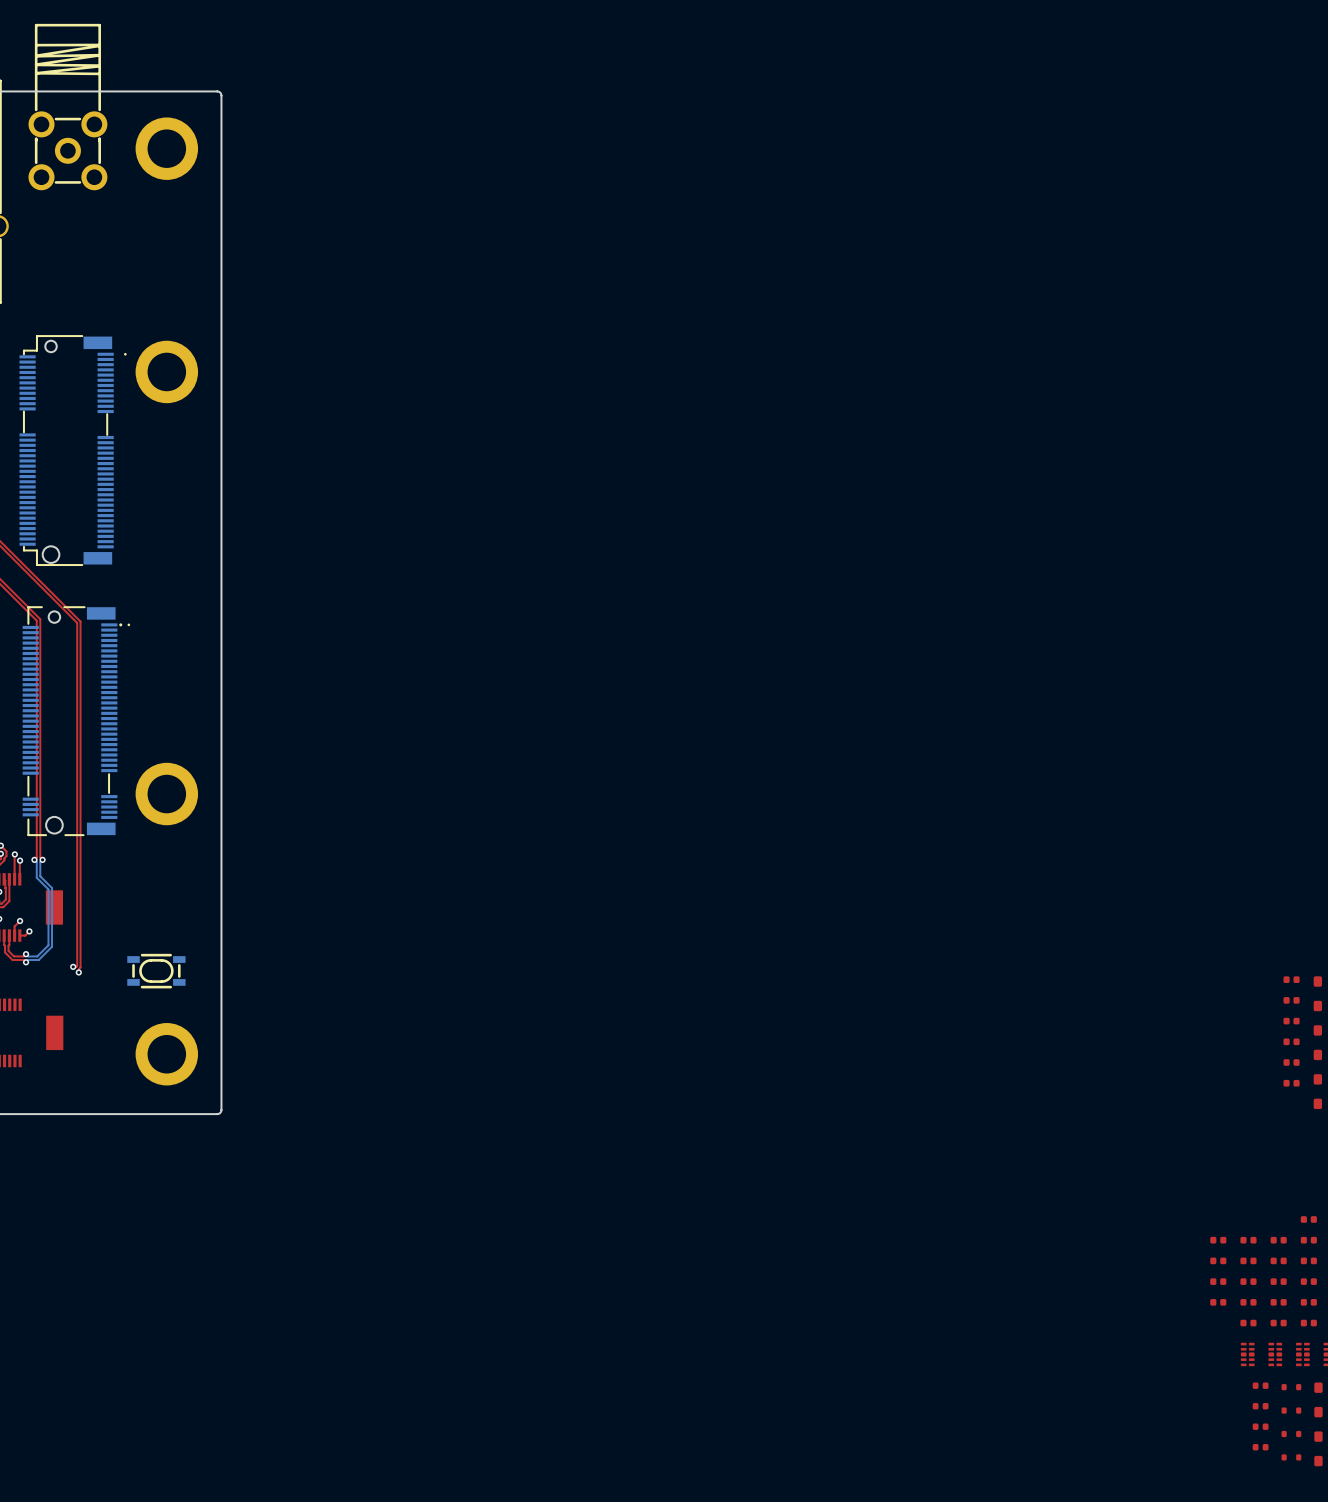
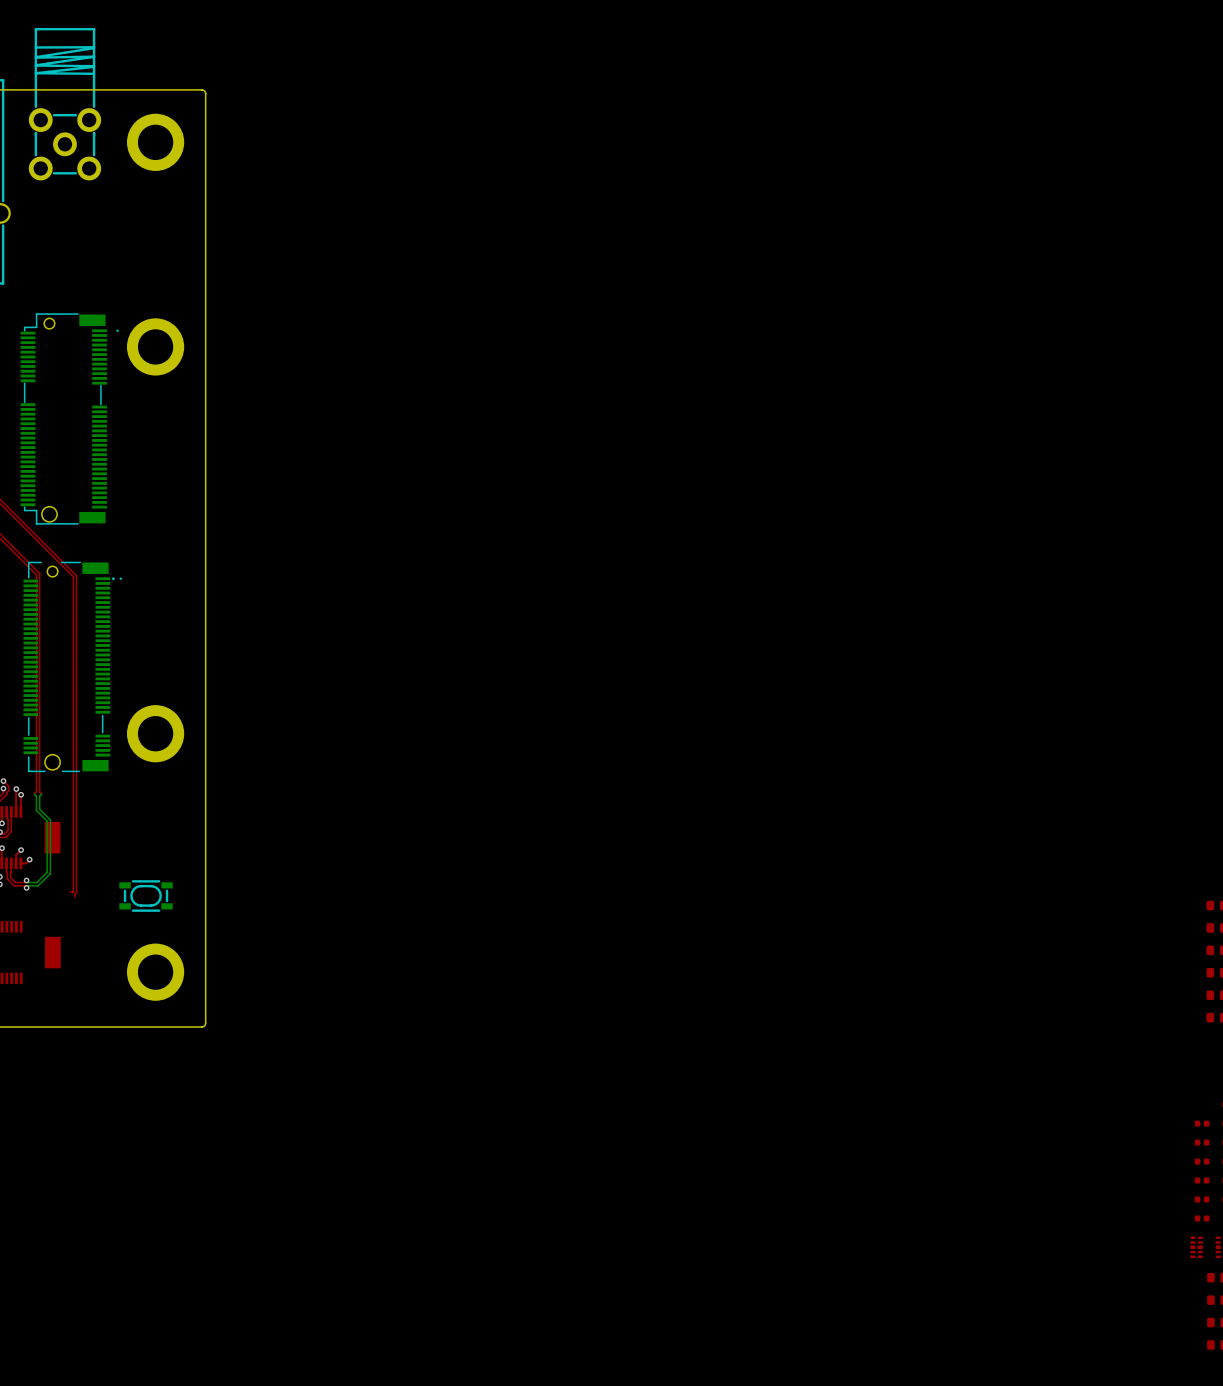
via: (34, 859) -> none
via: (42, 859) -> none
via: (73, 966) -> none
via: (78, 972) -> none
part: (1291, 979) -> none
part: (1291, 1000) -> none
part: (1291, 1021) -> none
part: (1291, 1041) -> none
part: (1291, 1062) -> none
part: (1291, 1083) -> none
part: (1218, 1240) -> none
part: (1248, 1240) -> none
part: (1278, 1240) -> none
part: (1218, 1260) -> none
part: (1248, 1260) -> none
part: (1278, 1260) -> none
part: (1218, 1281) -> none
part: (1248, 1281) -> none
part: (1278, 1281) -> none
part: (1218, 1302) -> none
part: (1248, 1302) -> none
part: (1278, 1302) -> none
part: (1248, 1323) -> none
part: (1278, 1323) -> none
part: (1247, 1354) -> none
part: (1275, 1354) -> none
part: (1260, 1385) -> none
part: (1291, 1387) -> none
part: (1260, 1406) -> none
part: (1291, 1410) -> none
part: (1260, 1426) -> none
part: (1291, 1434) -> none
part: (1260, 1447) -> none
part: (1291, 1457) -> none

